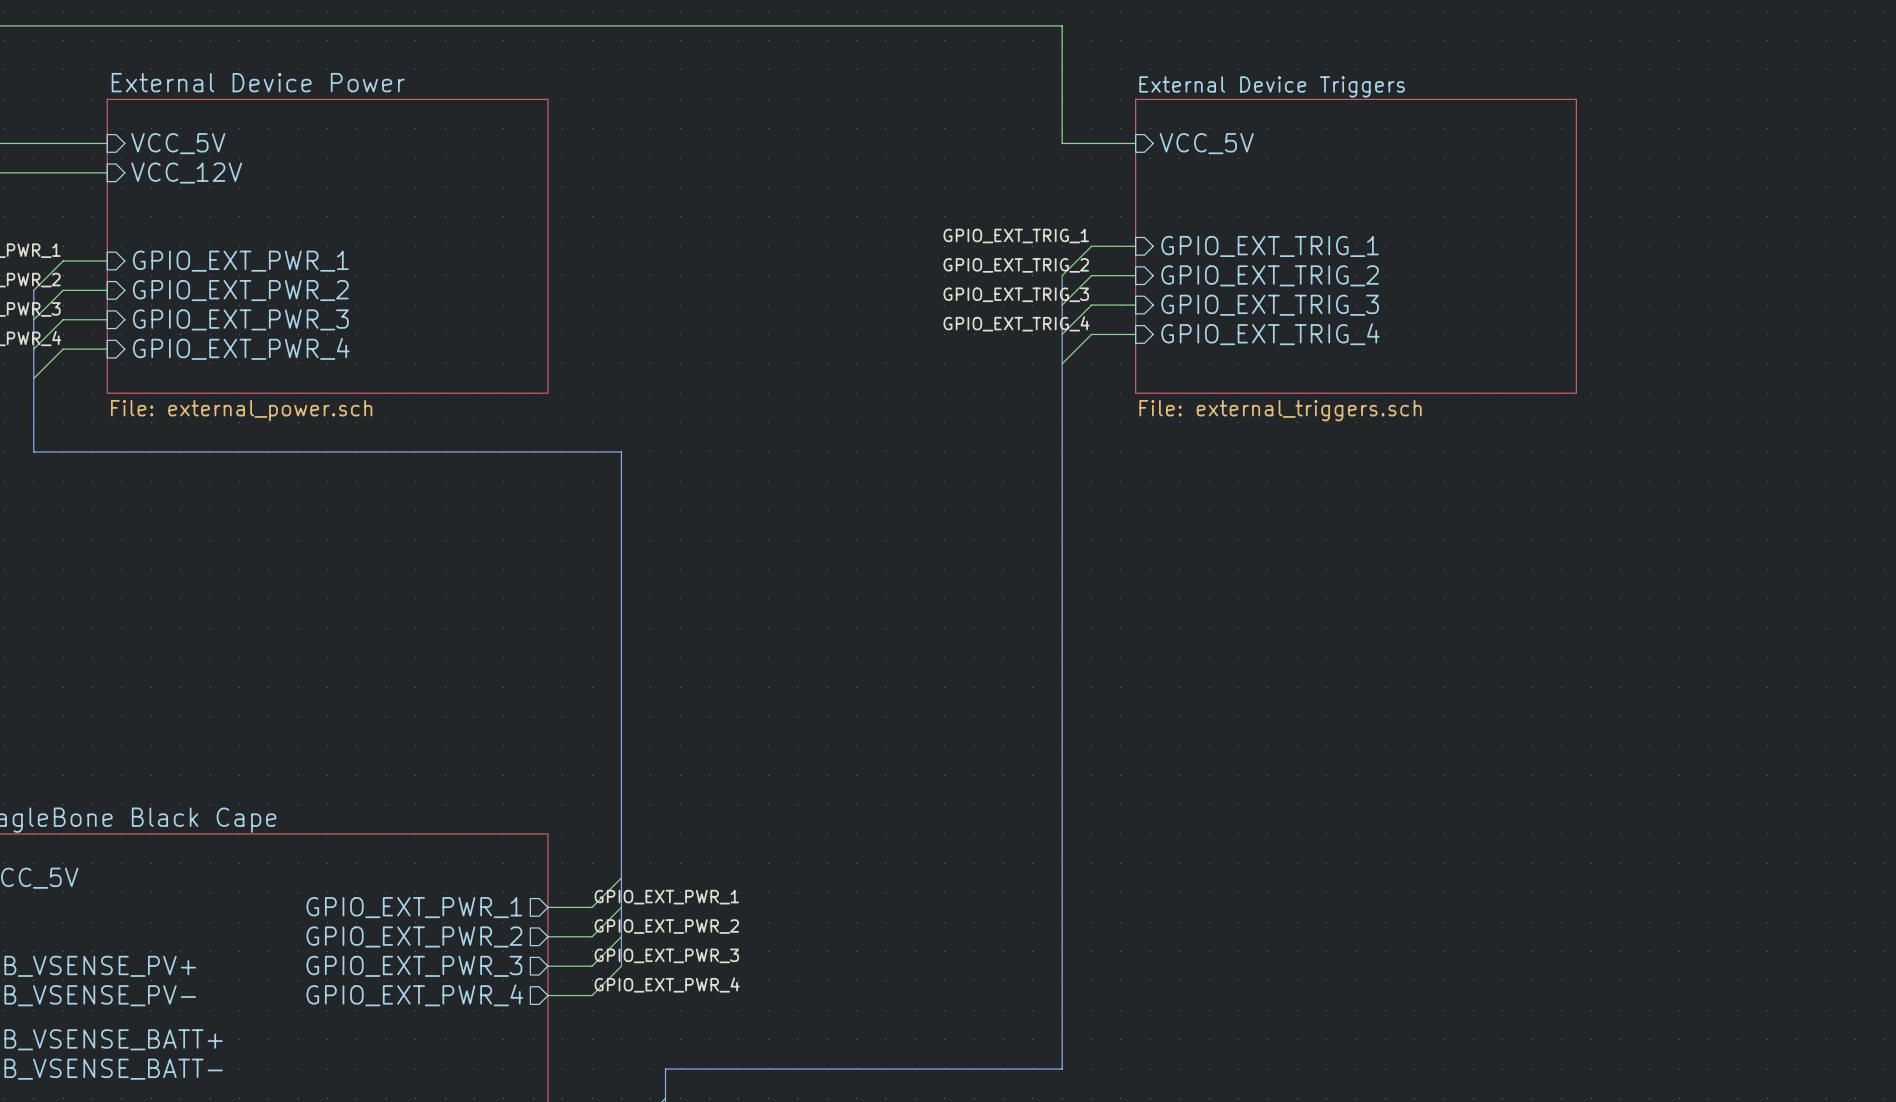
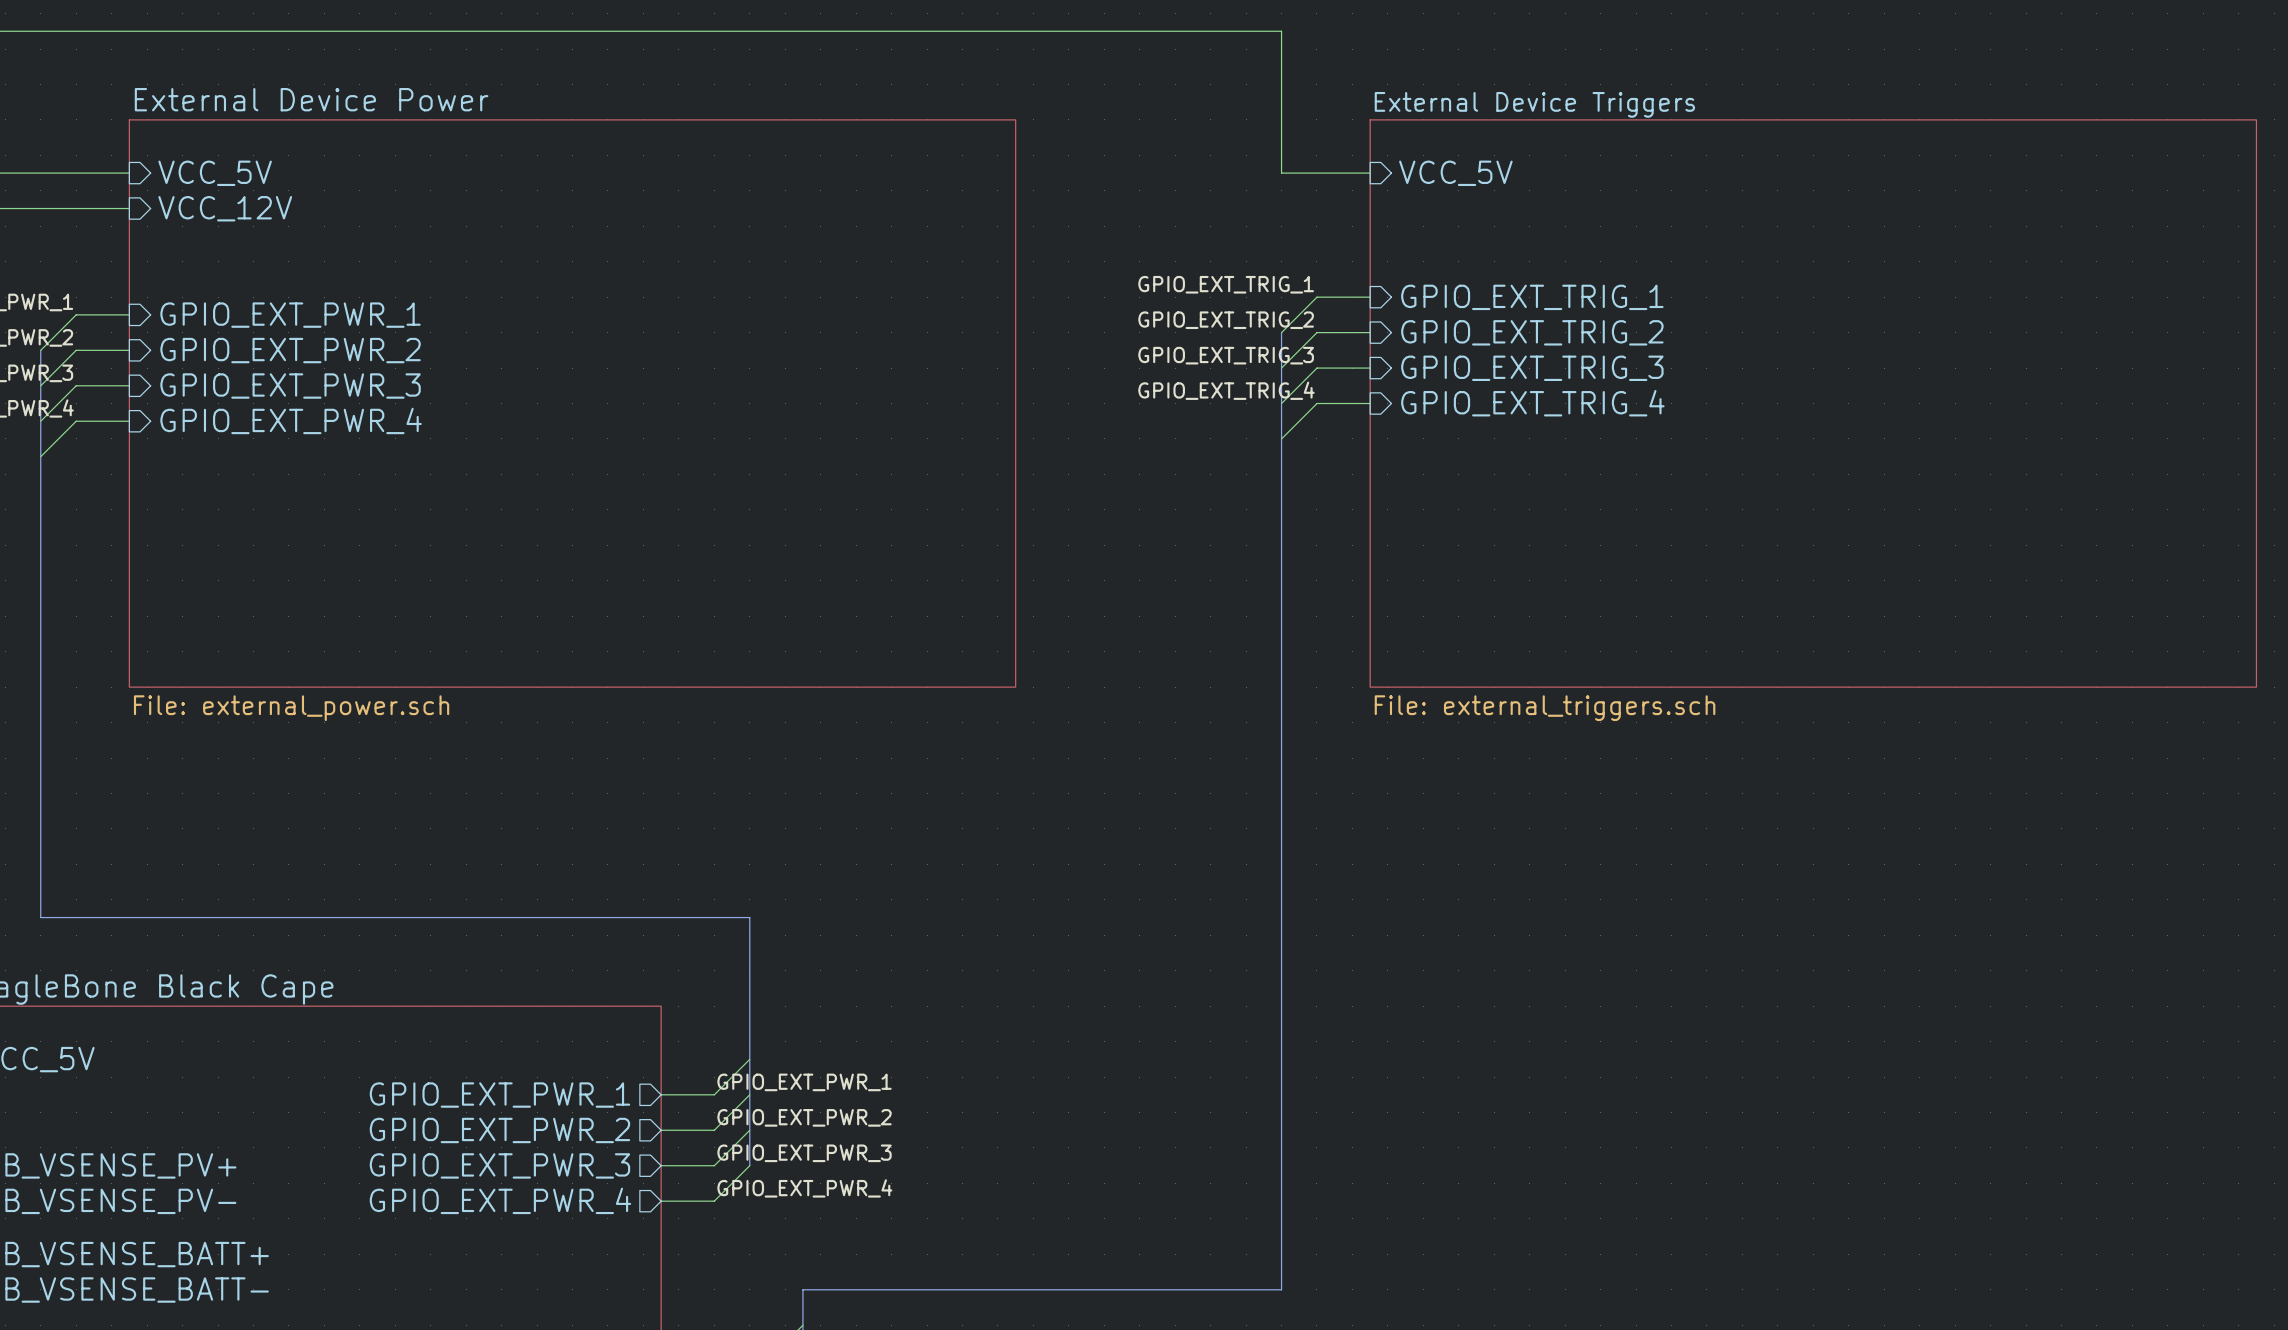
sheet External Device Power: File: external_power.sch (327, 246) -> none
sheet External Device Triggers: File: external_triggers.sch (1356, 246) -> none
sheet External Device Power: none -> File: external_power.sch (572, 403)
sheet External Device Triggers: none -> File: external_triggers.sch (1813, 403)
bus: (33, 451) (621, 451) (621, 760) -> (40, 545) (40, 917) (749, 917)

